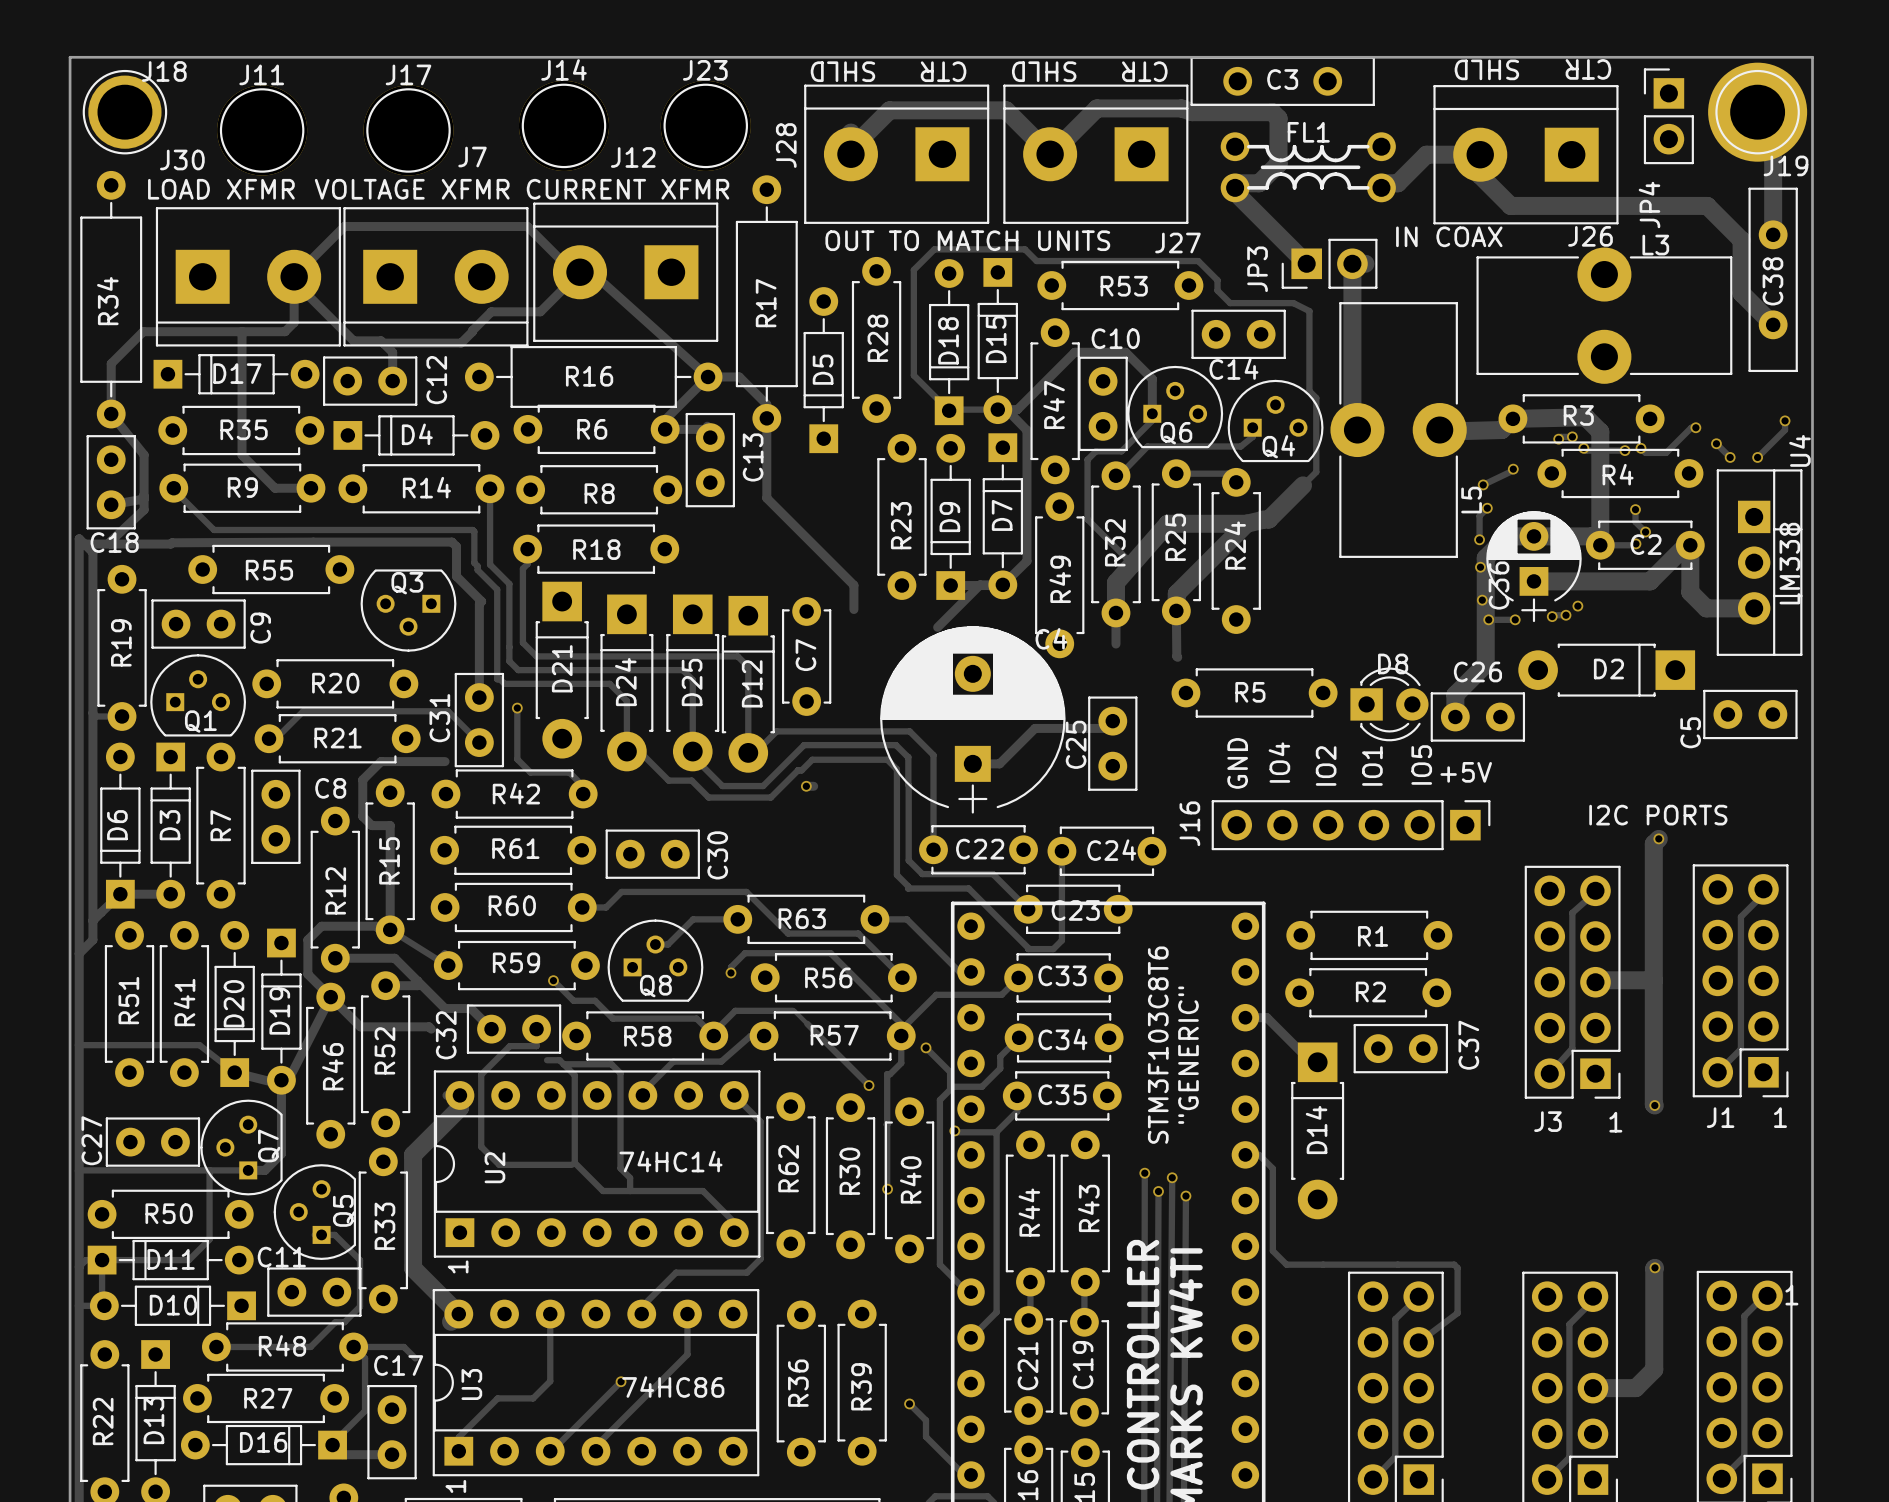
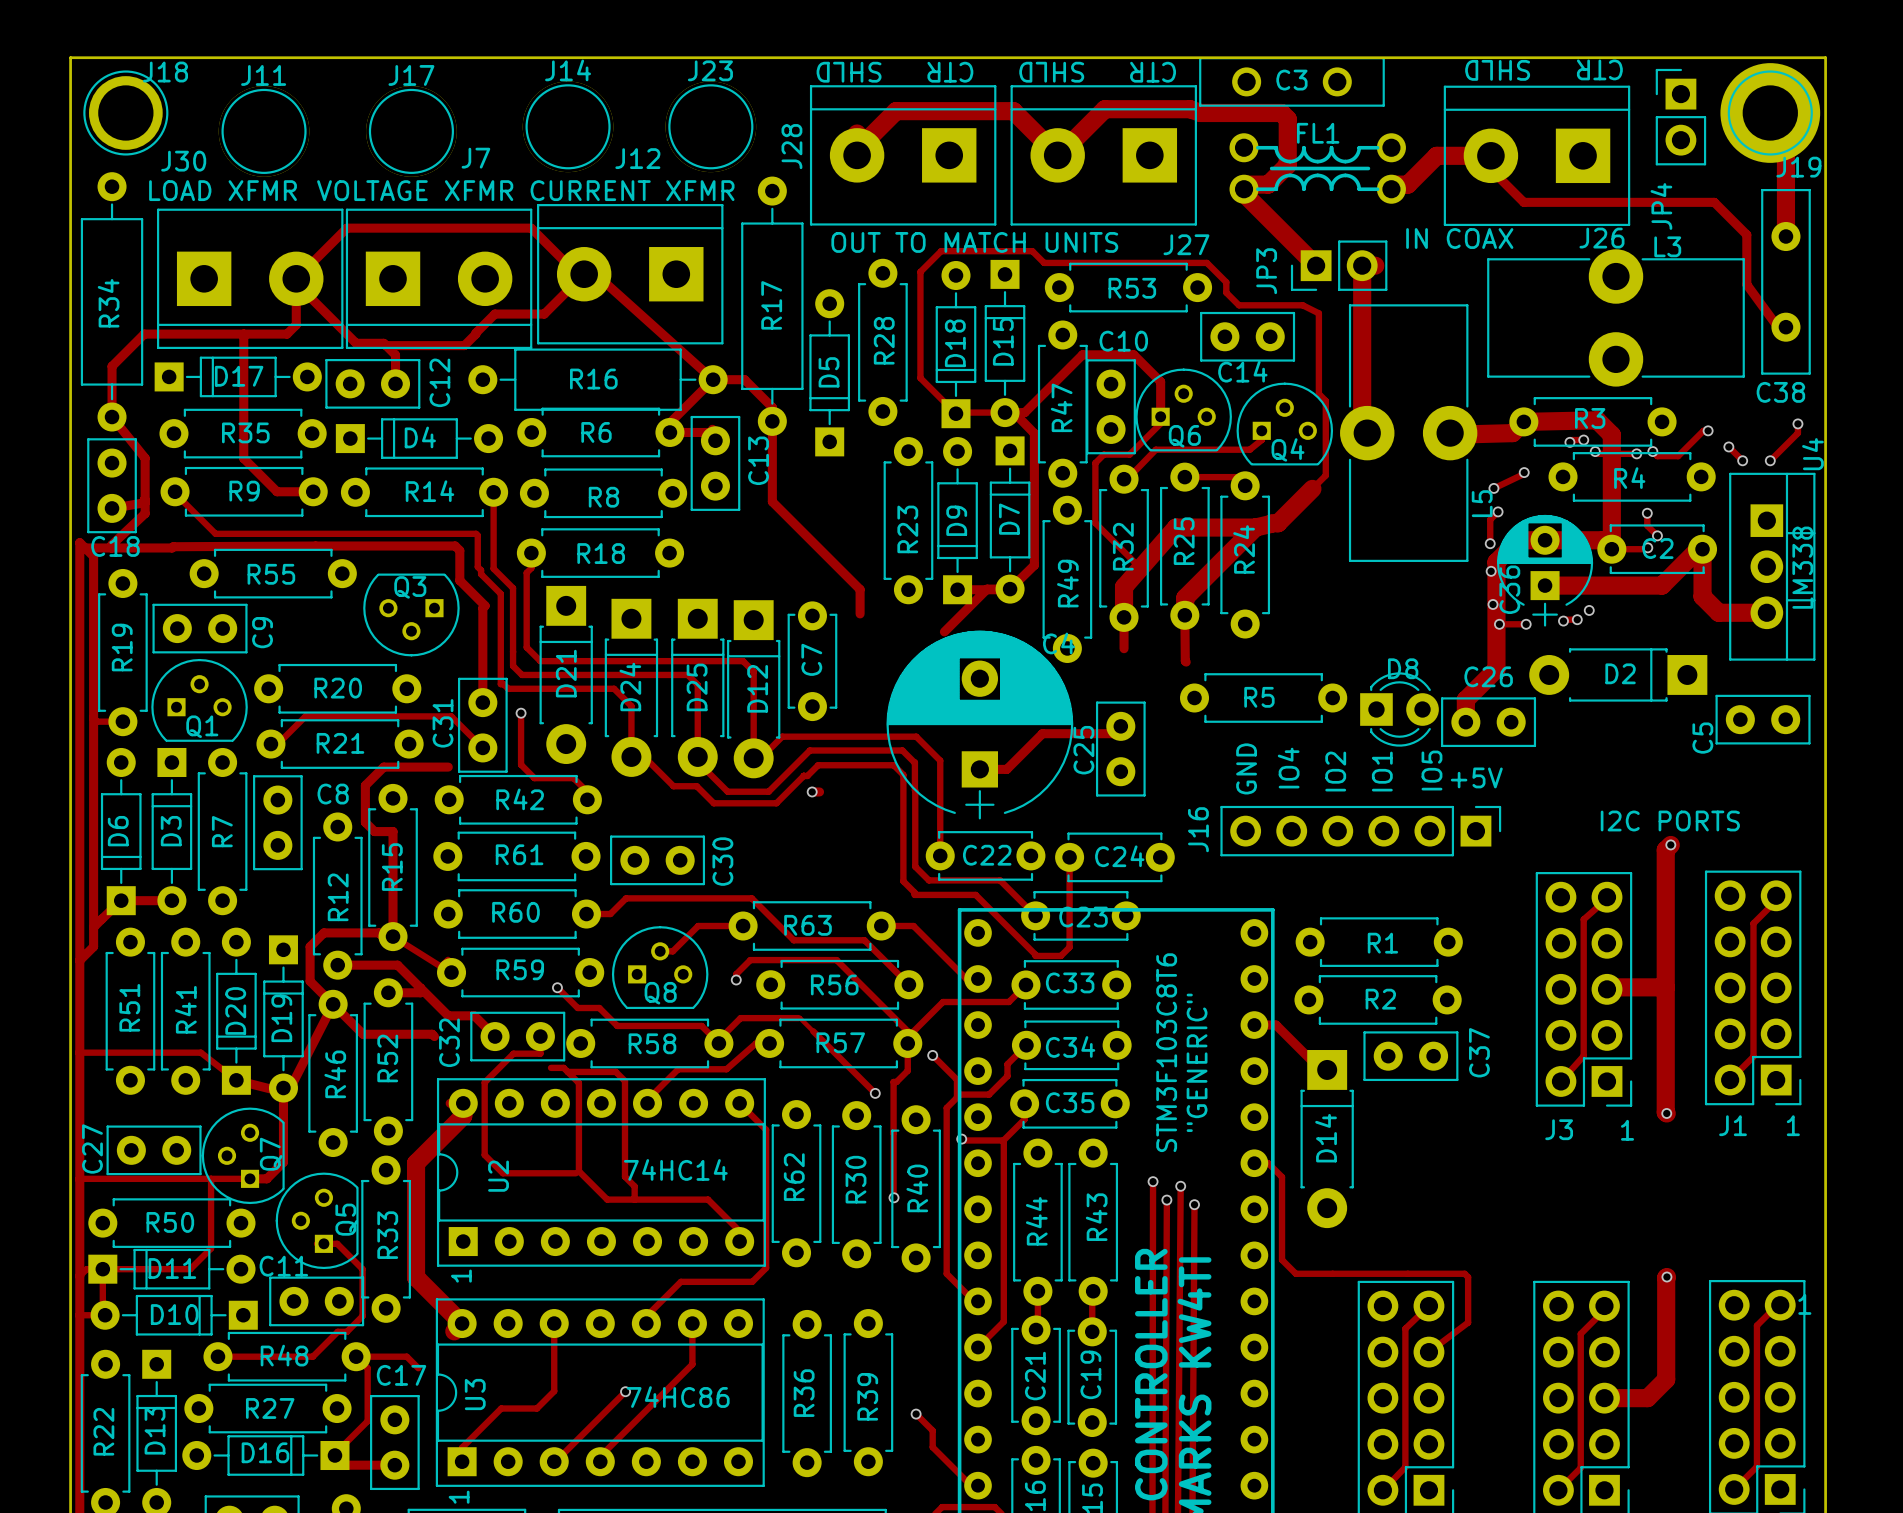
track: (1480, 154) (1480, 175) (1510, 205) (1707, 205) (1741, 240) (1741, 293) (1773, 324) -> none
track: none -> (1490, 169) (1523, 202) (1714, 202) (1746, 234) (1746, 284) (1777, 327)
C38 name rotation: 0° (1772, 281) -> 90° clockwise (1780, 392)
C38 name position: C38 (1772, 281) -> C38 (1780, 392)

